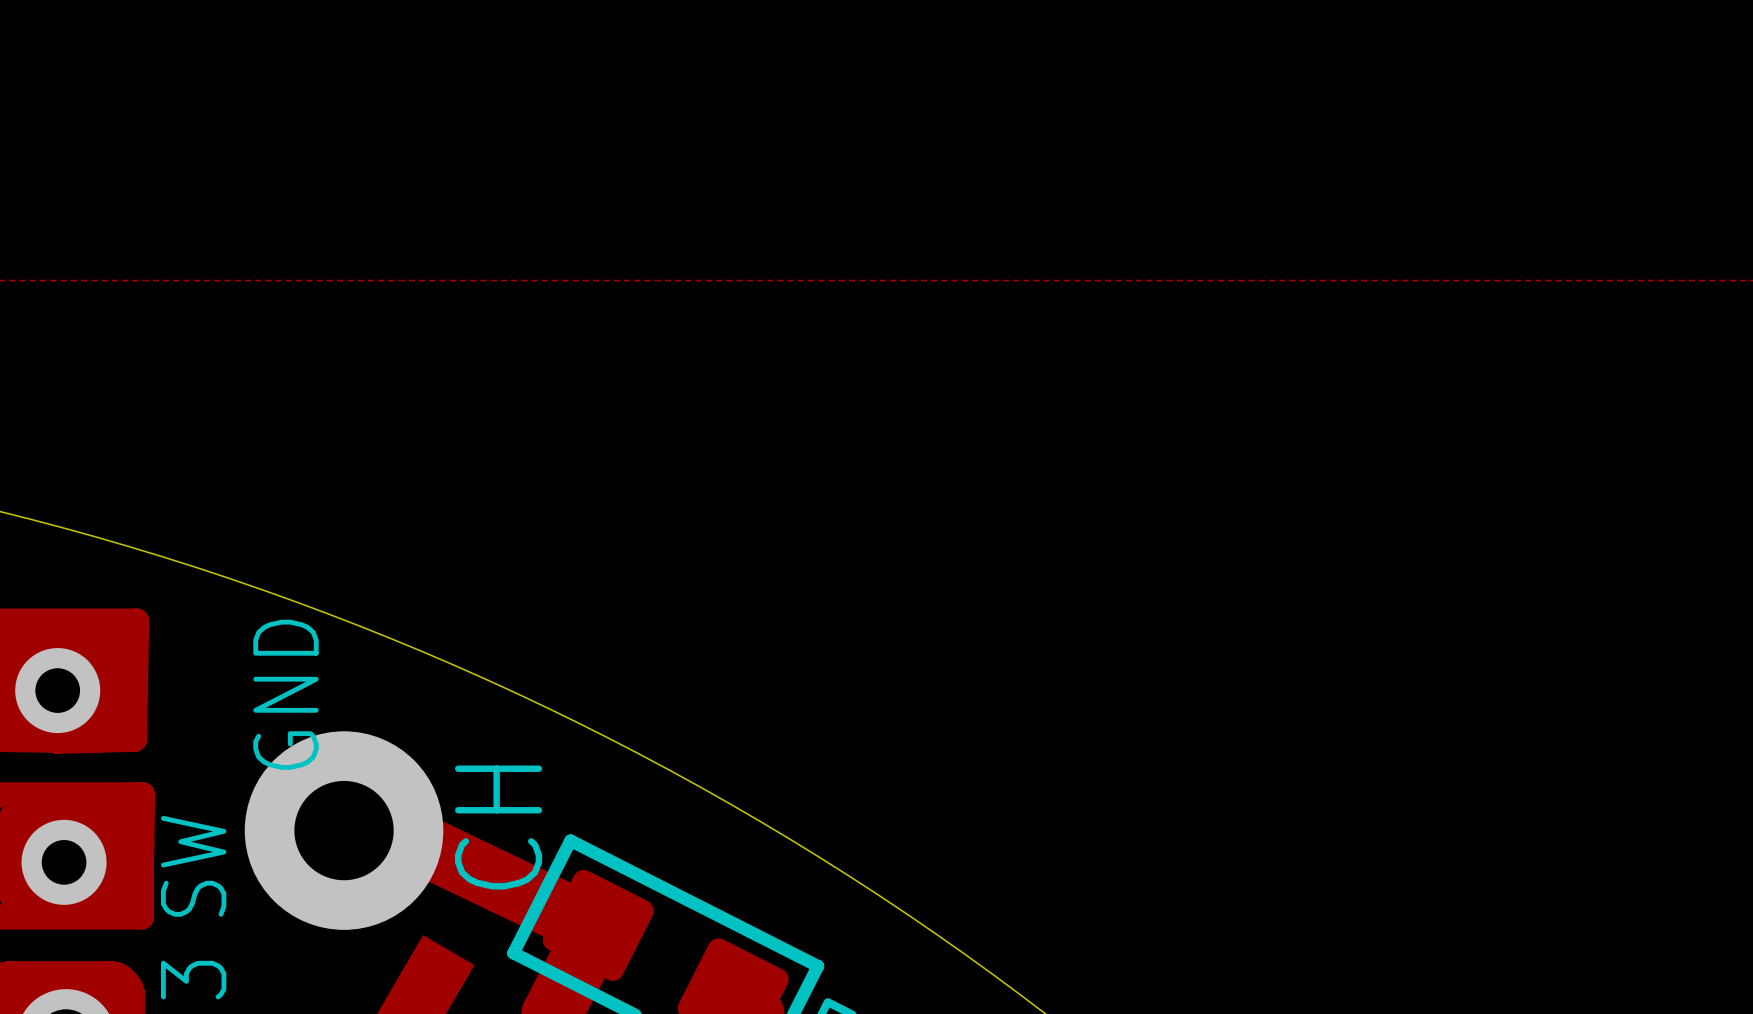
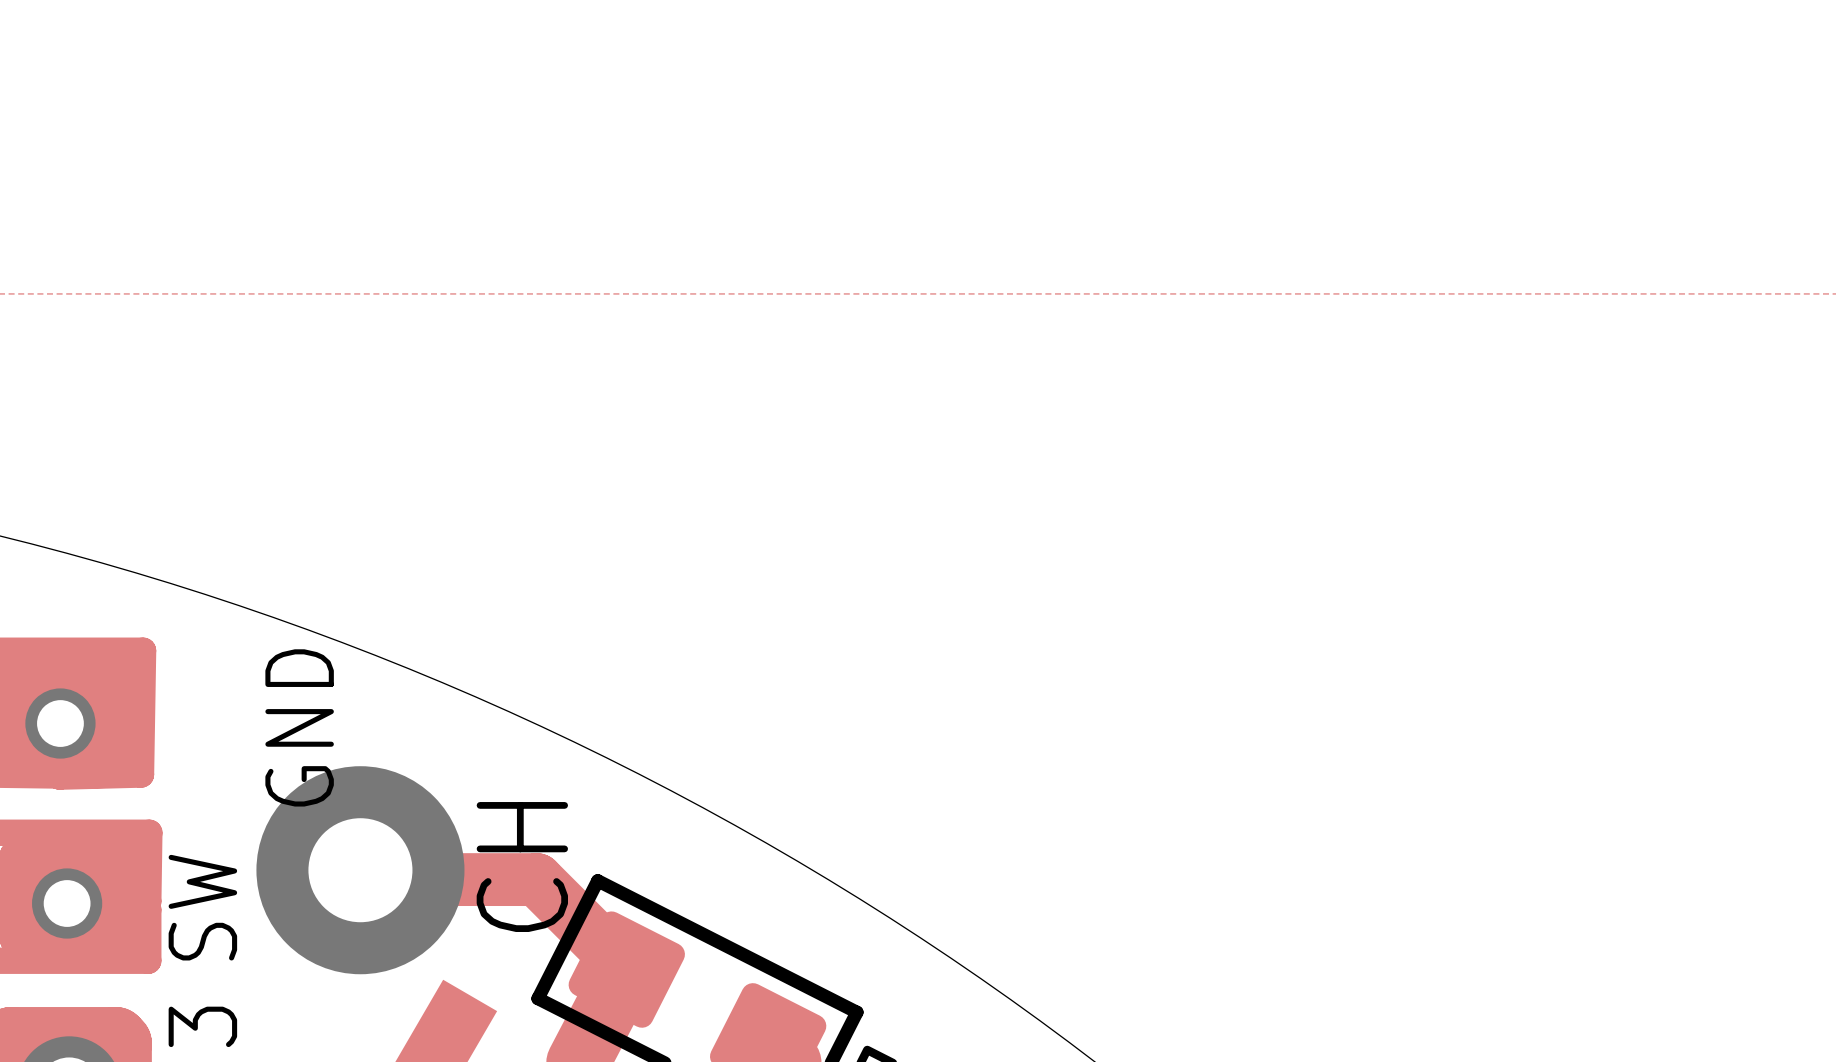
via size: [15, 648, 101, 734] -> [25, 688, 96, 759]
via size: [21, 819, 107, 905] -> [32, 868, 103, 939]
track: (410, 839) (590, 925) -> (430, 879) (536, 879) (626, 969)

